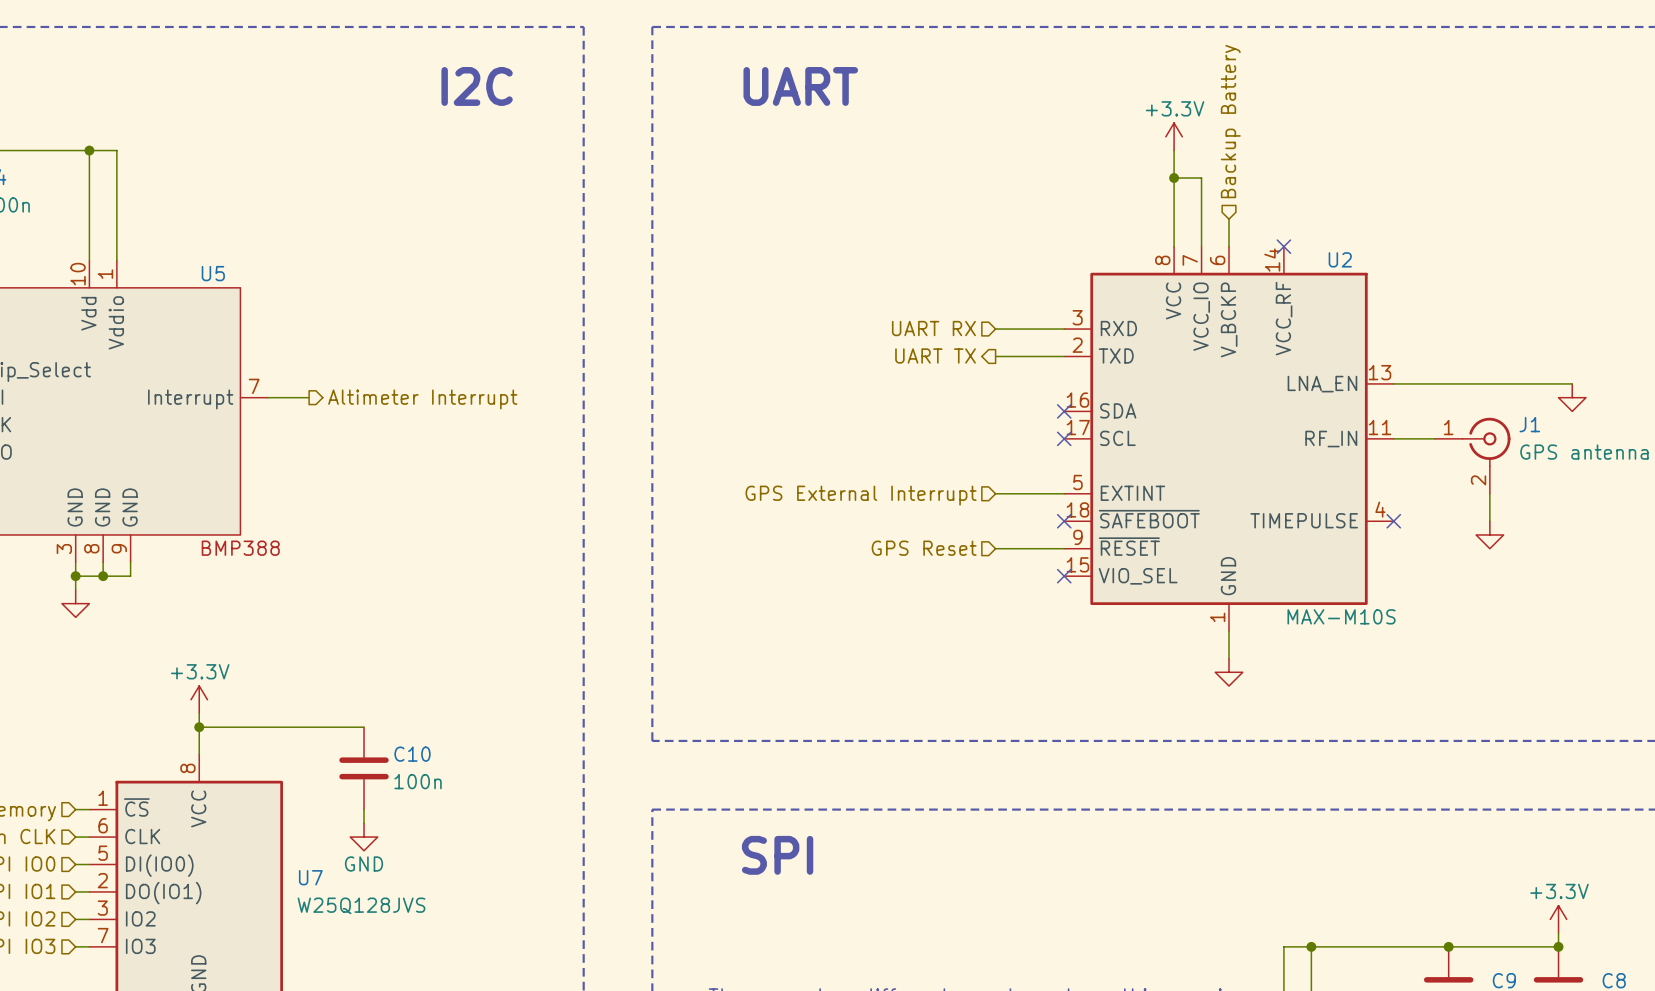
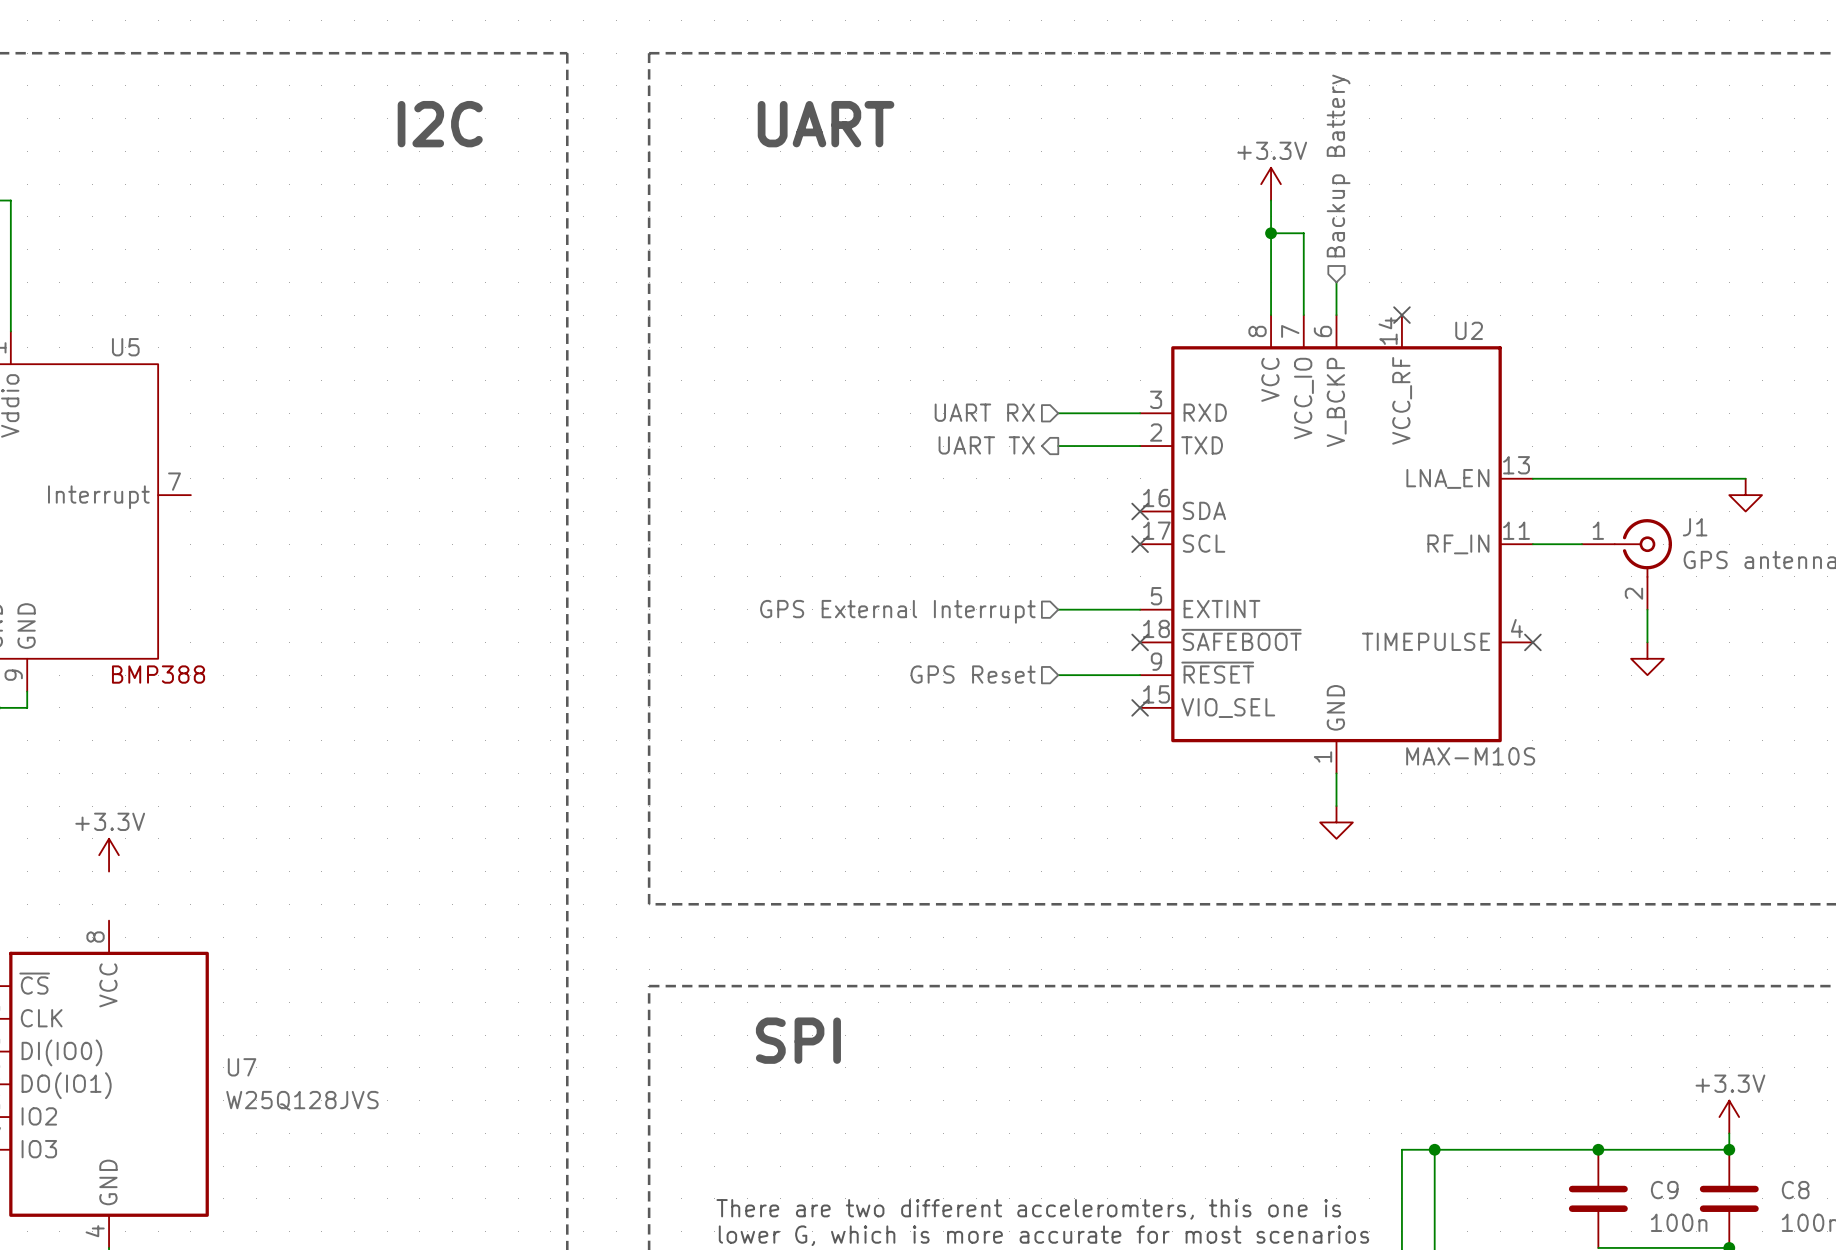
wire: (267, 397) (309, 397) -> none
hierarchical label: Altimeter Interrupt (422, 399) -> none
wire: (199, 713) (199, 754) -> none
wire: (199, 727) (364, 727) -> none
junction: (199, 727) -> none
C10: 100n (364, 768) -> none
wire: (364, 809) (364, 823) -> none
power symbol: GND (364, 837) -> none

